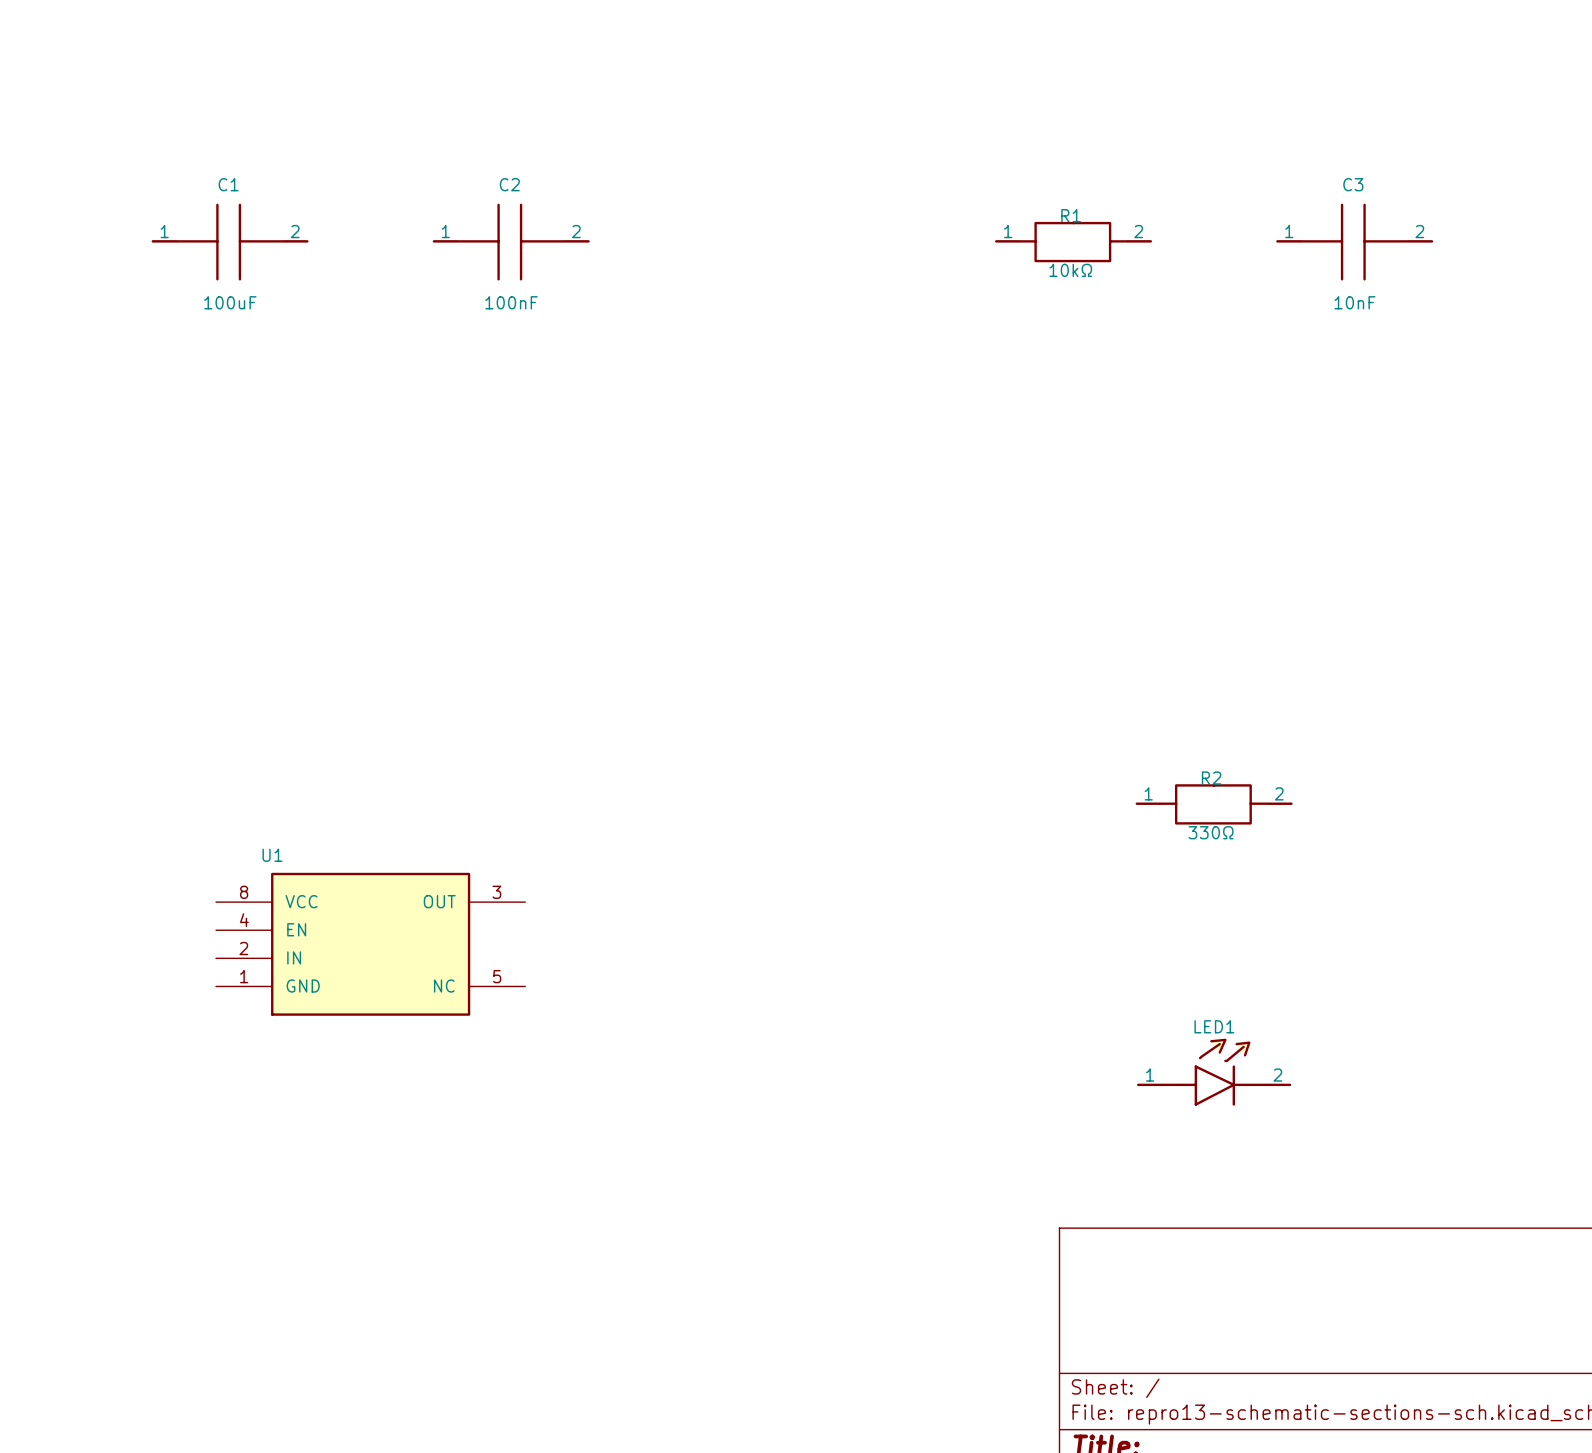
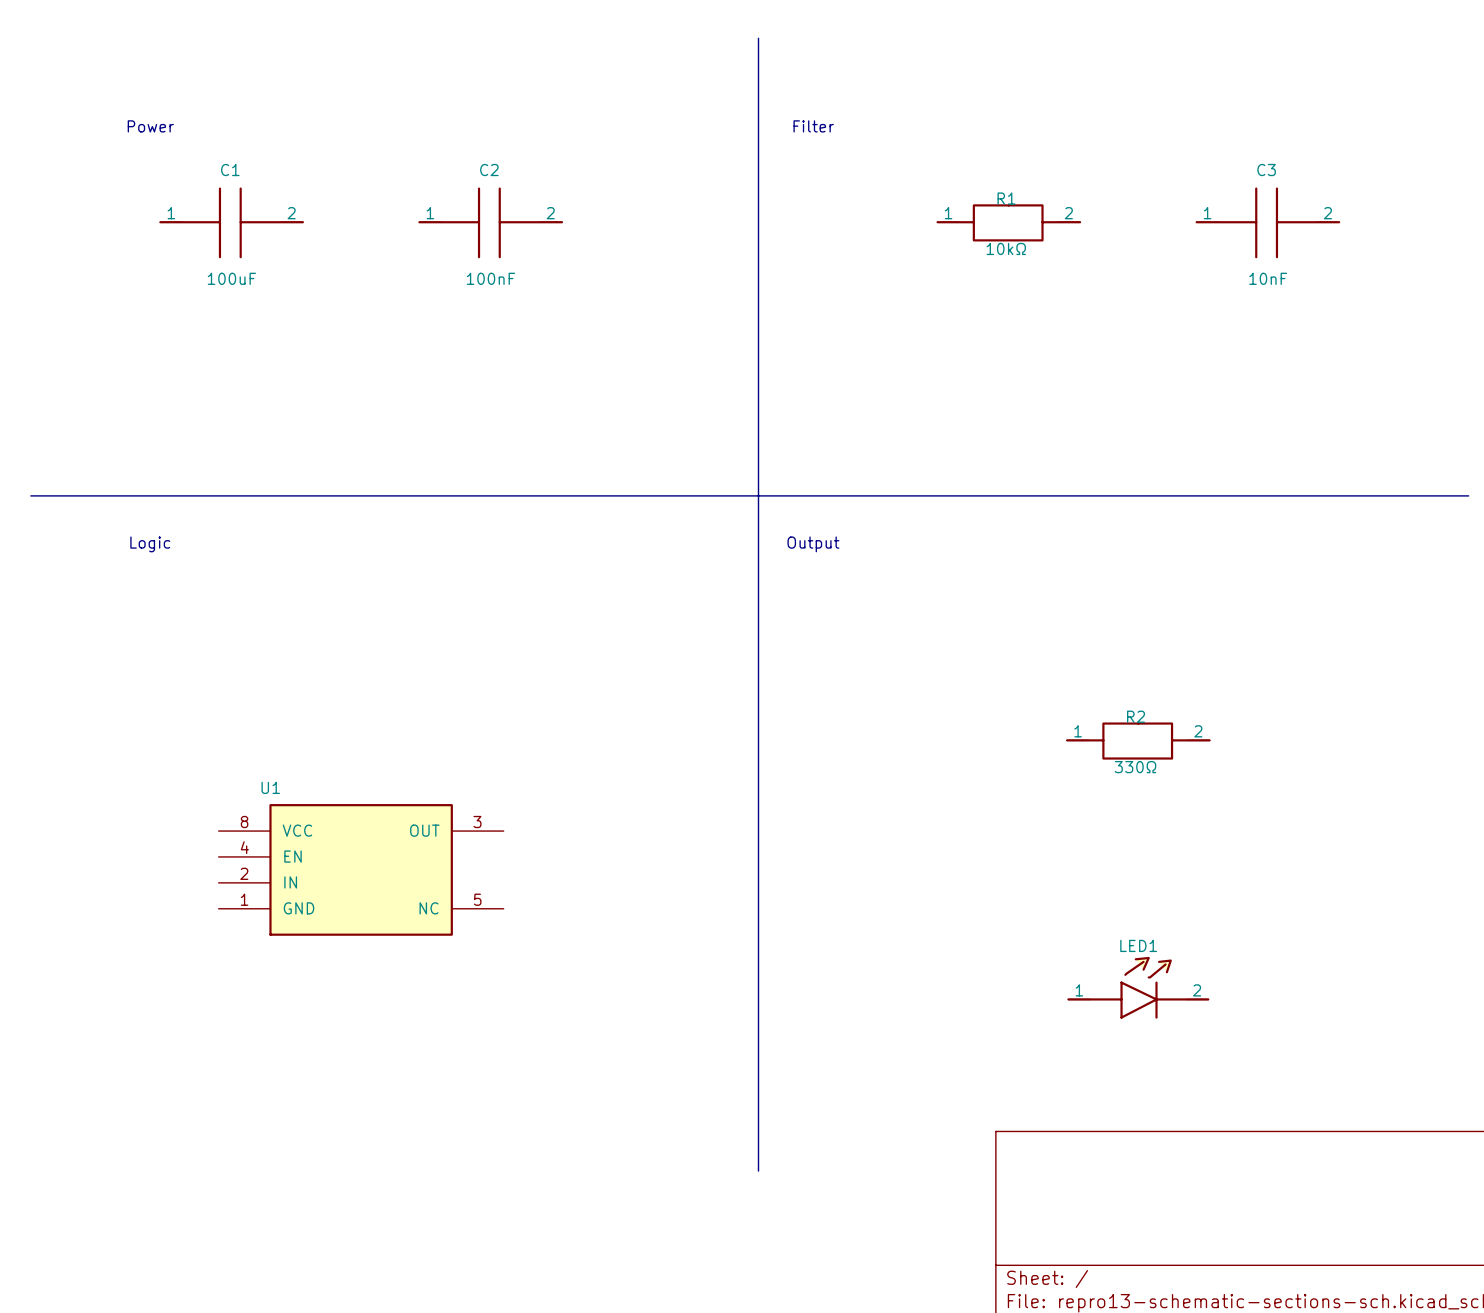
line: none -> (758, 38) (758, 1171)
text: none -> Power (150, 126)
text: none -> Filter (813, 126)
line: none -> (30, 495) (1468, 495)
text: none -> Logic (150, 544)
text: none -> Output (813, 544)

